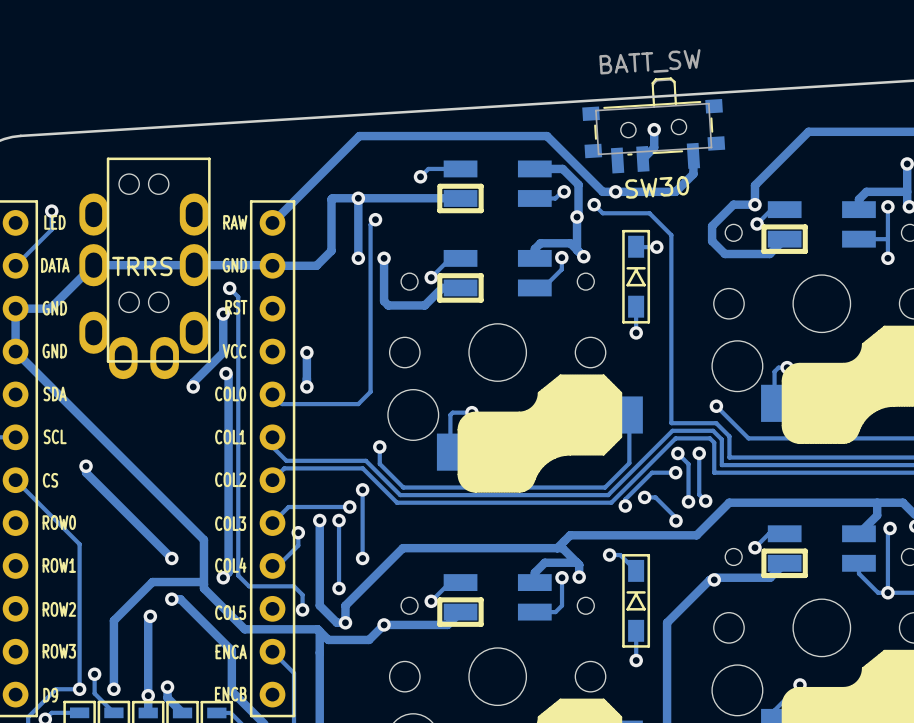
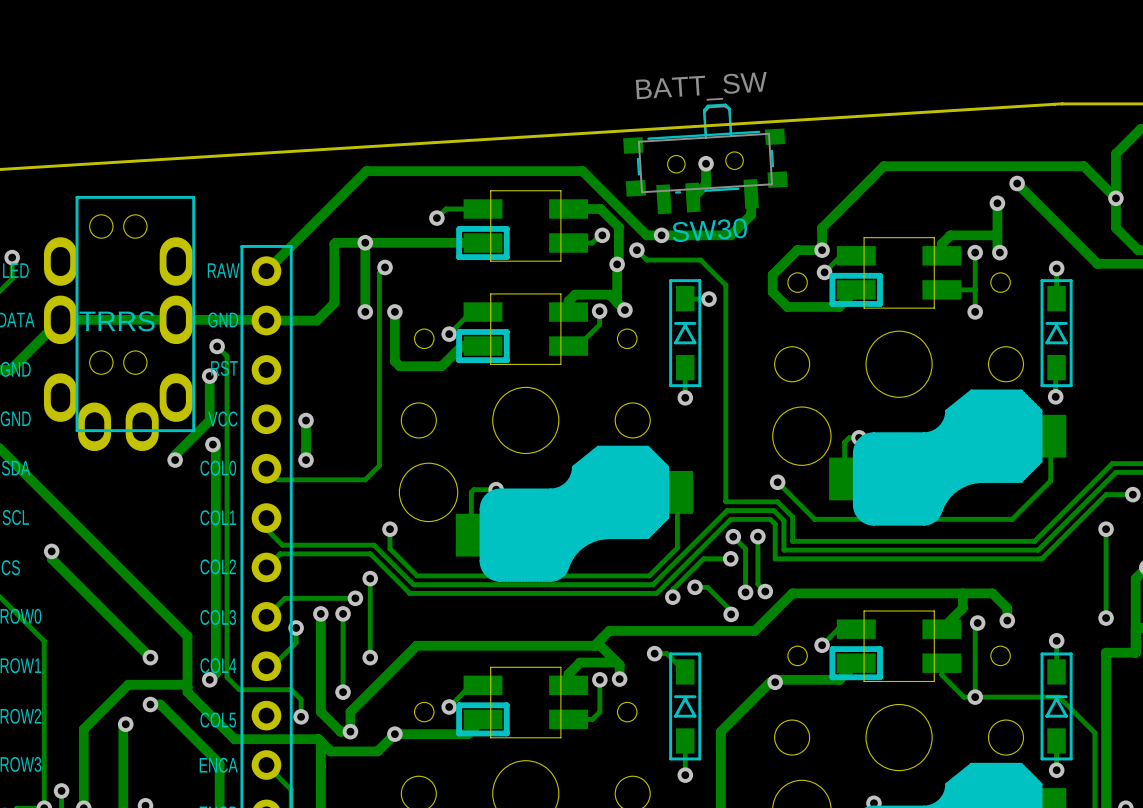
board edge: none -> (560, 190) (560, 261) (490, 261) (490, 190) (560, 190)
board edge: none -> (934, 237) (934, 308) (864, 308) (864, 237) (934, 237)
board edge: none -> (560, 293) (560, 364) (490, 364) (490, 293) (560, 293)
board edge: none -> (934, 611) (864, 611) (864, 681) (934, 681) (934, 611)
board edge: none -> (560, 667) (490, 667) (490, 737) (560, 737) (560, 667)

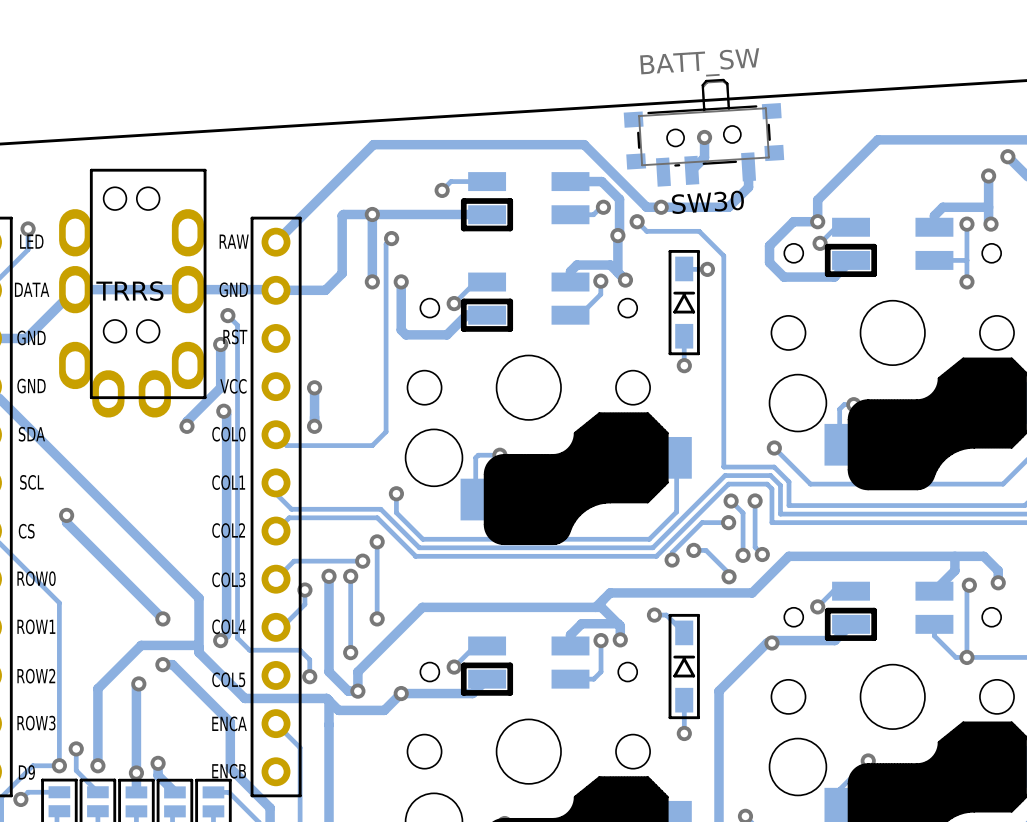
board edge: (560, 190) (560, 261) (490, 261) (490, 190) (560, 190) -> none
board edge: (934, 237) (934, 308) (864, 308) (864, 237) (934, 237) -> none
board edge: (560, 293) (560, 364) (490, 364) (490, 293) (560, 293) -> none
board edge: (934, 611) (864, 611) (864, 681) (934, 681) (934, 611) -> none
board edge: (560, 667) (490, 667) (490, 737) (560, 737) (560, 667) -> none

